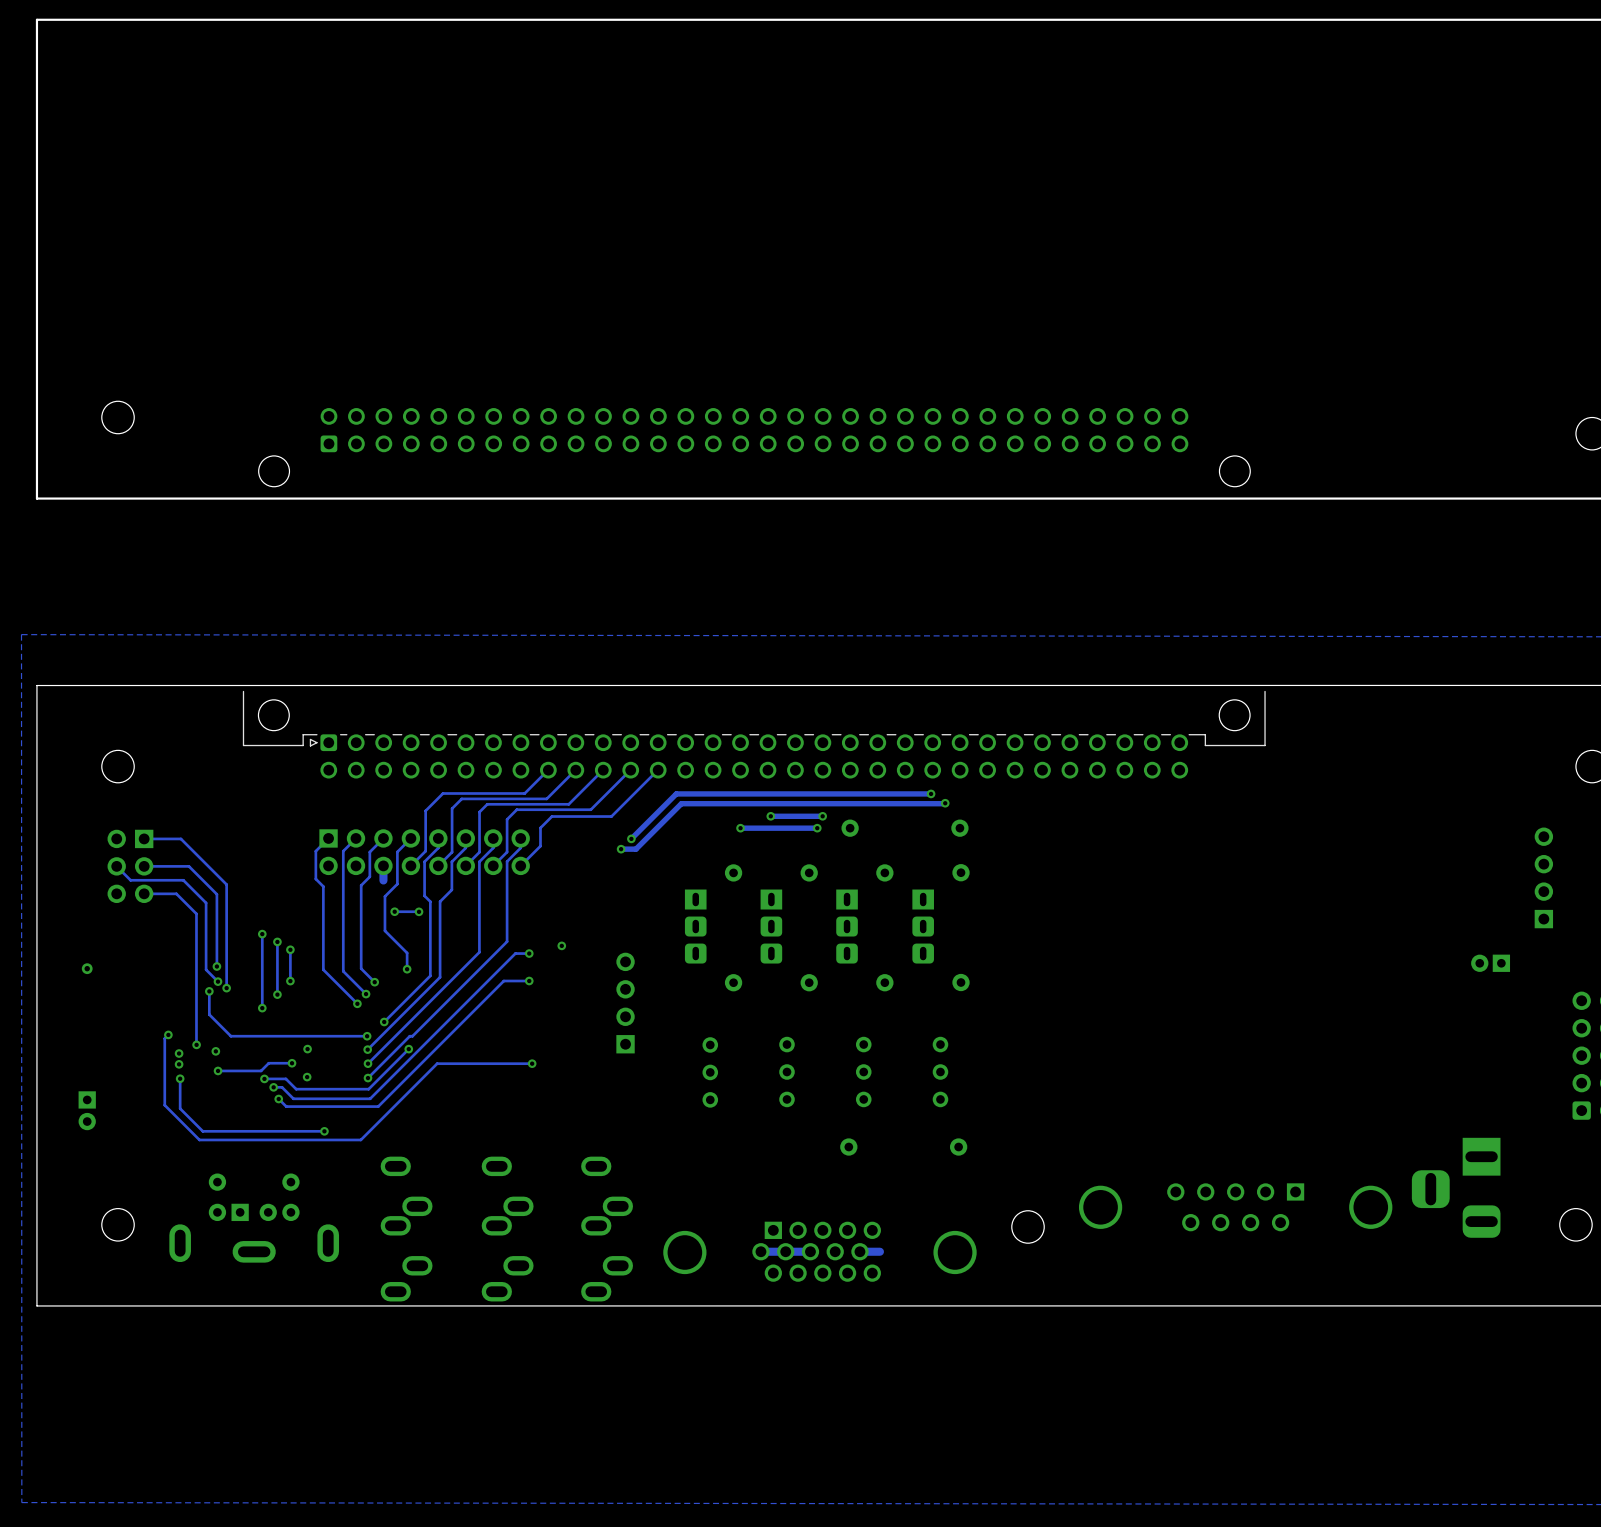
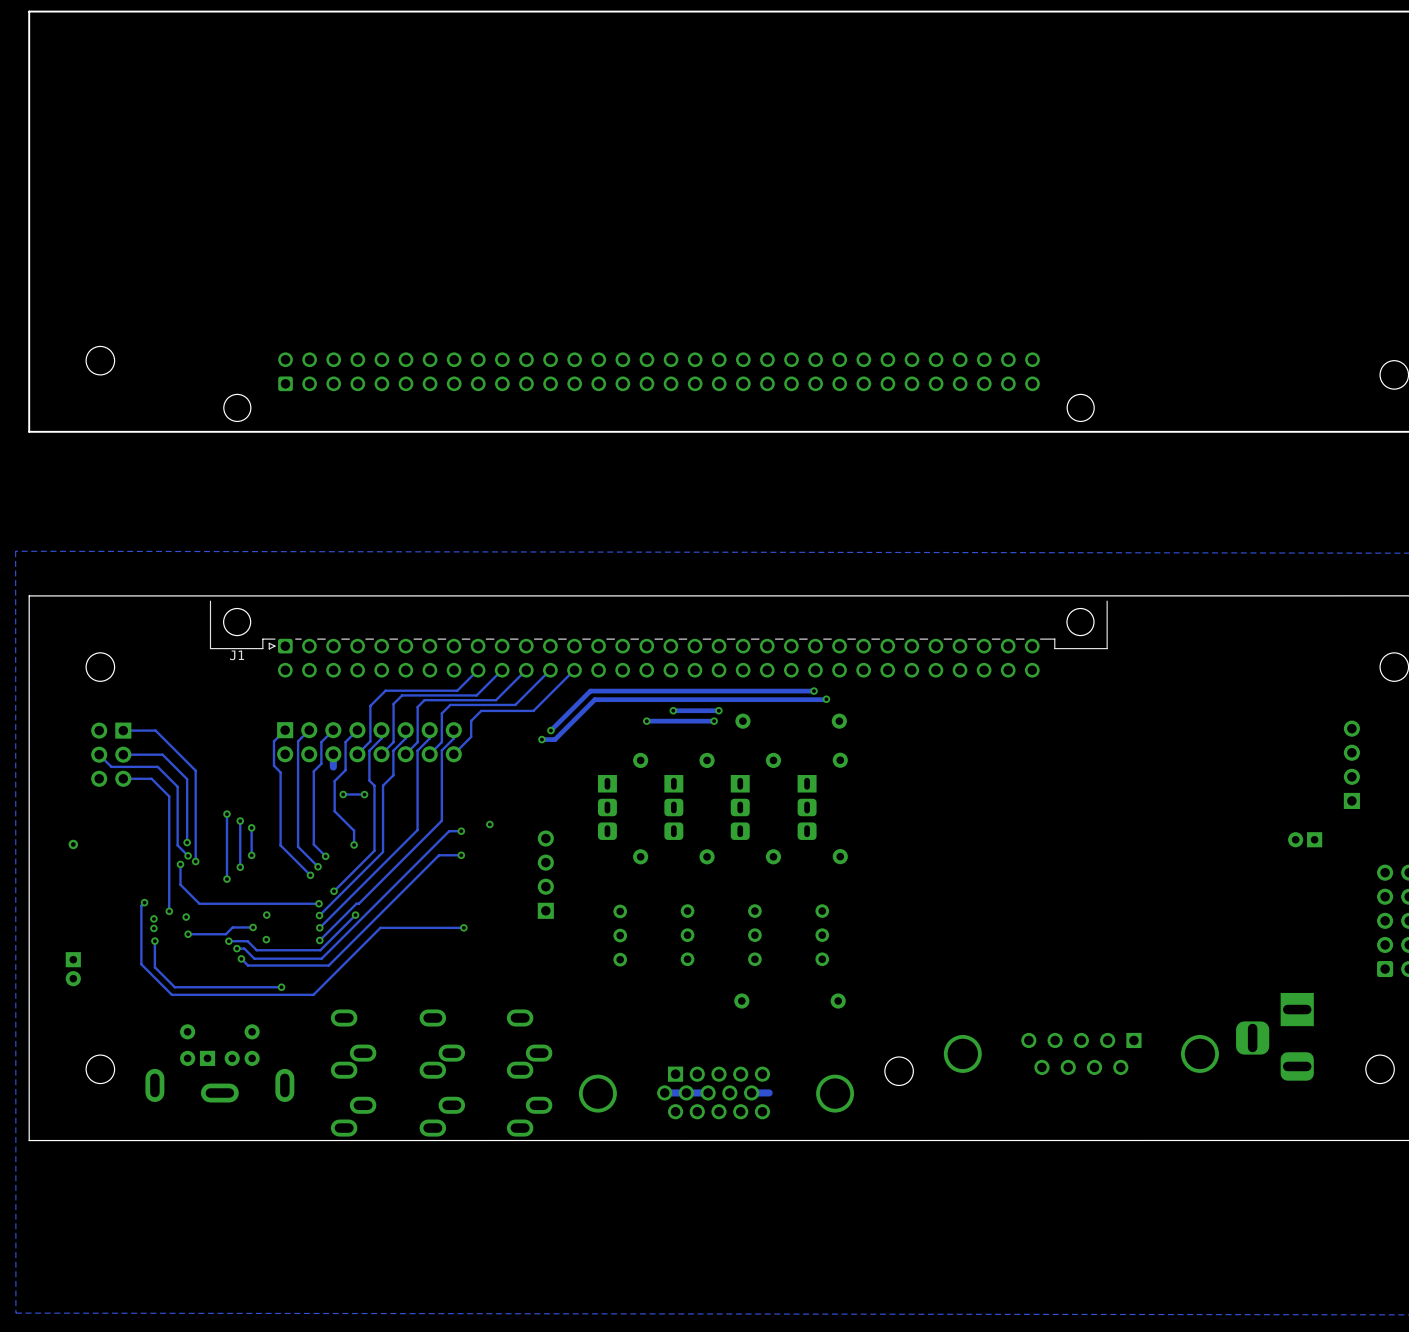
J1 name: none -> J1 (237, 655)

